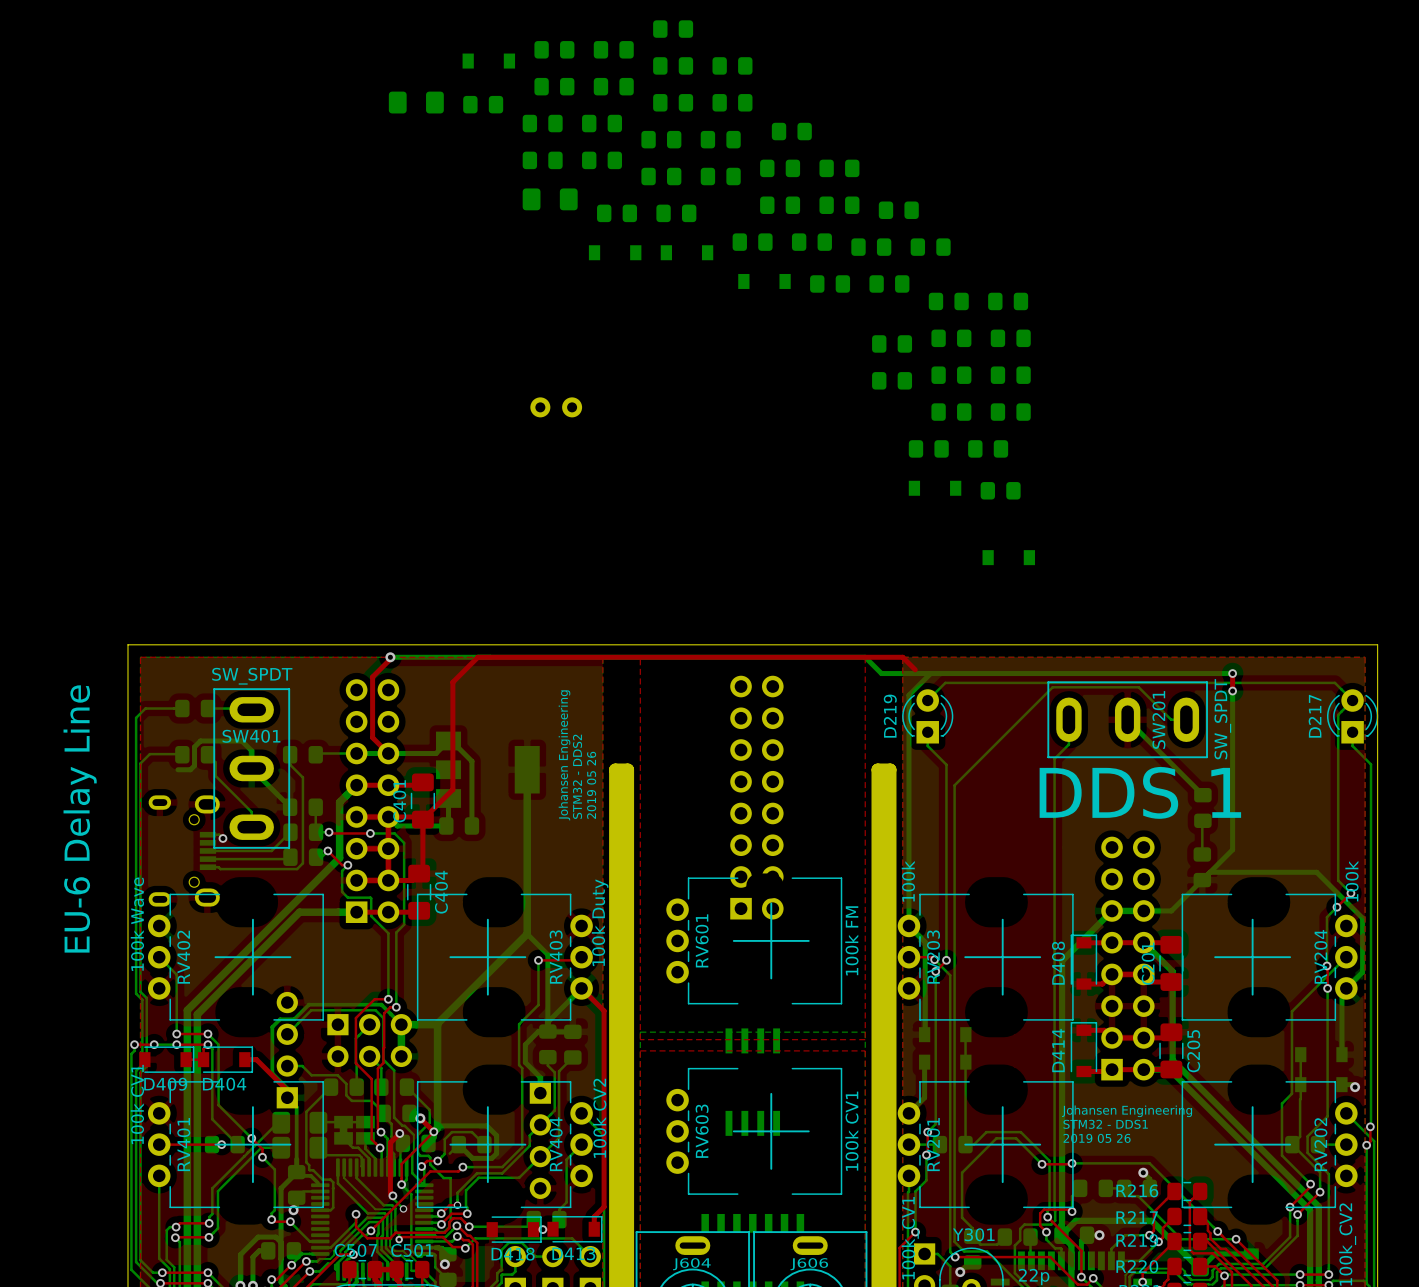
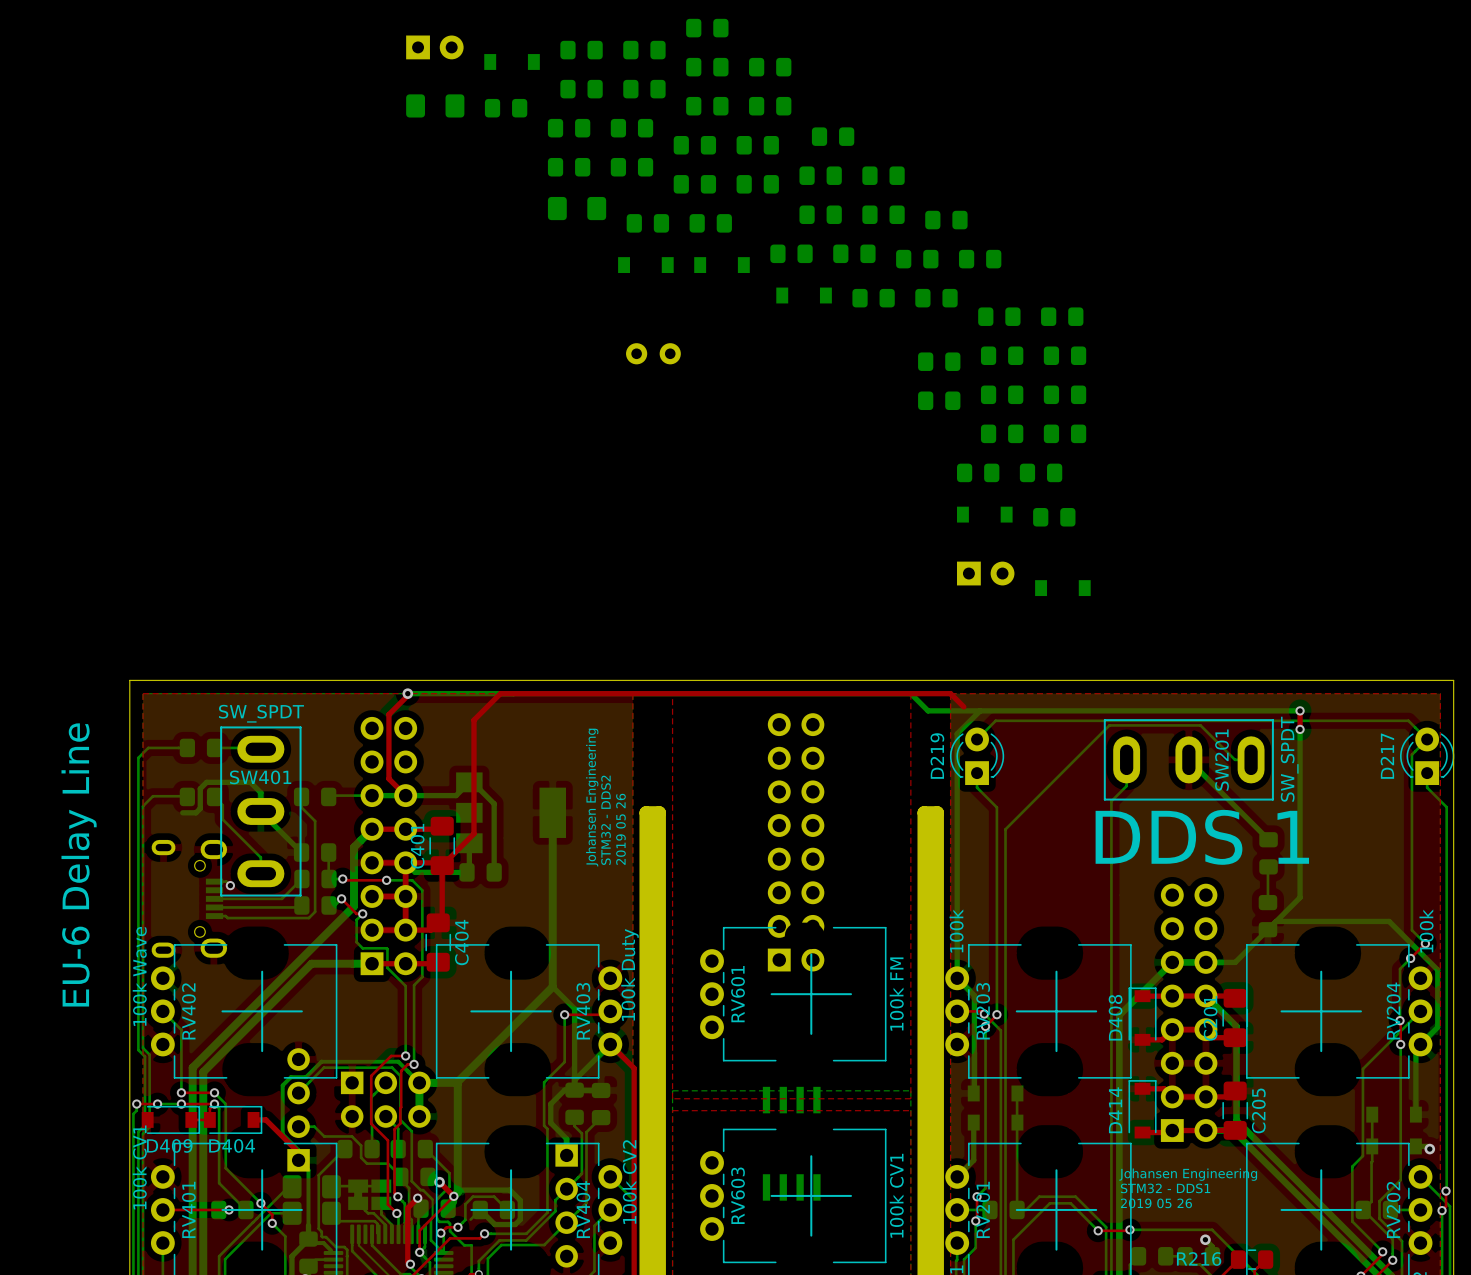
part: none -> (434, 47)
part position: (556, 407) -> (653, 353)
part: none -> (985, 573)

